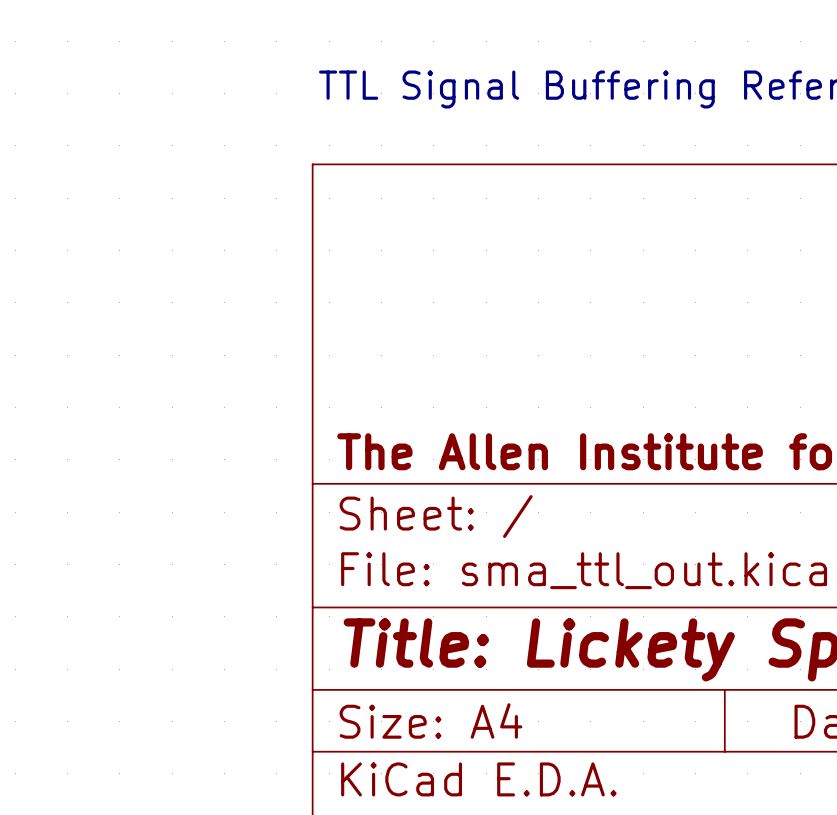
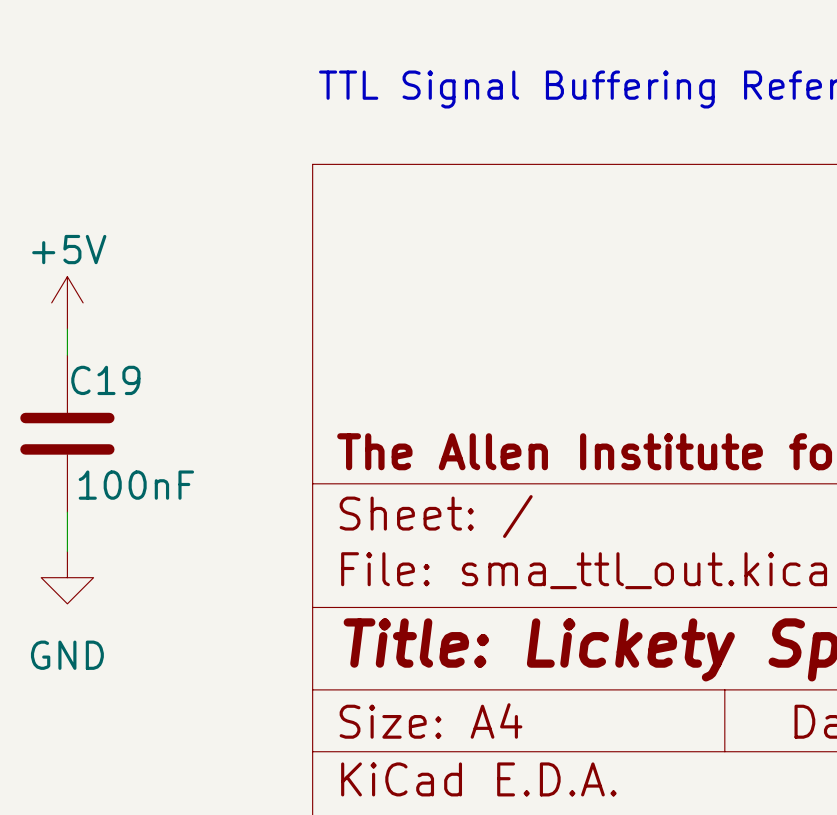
power symbol: none -> +5V (67, 302)
wire: none -> (67, 329) (67, 355)
C19: none -> 100nF (67, 433)
wire: none -> (67, 512) (67, 551)
power symbol: none -> GND (67, 577)

